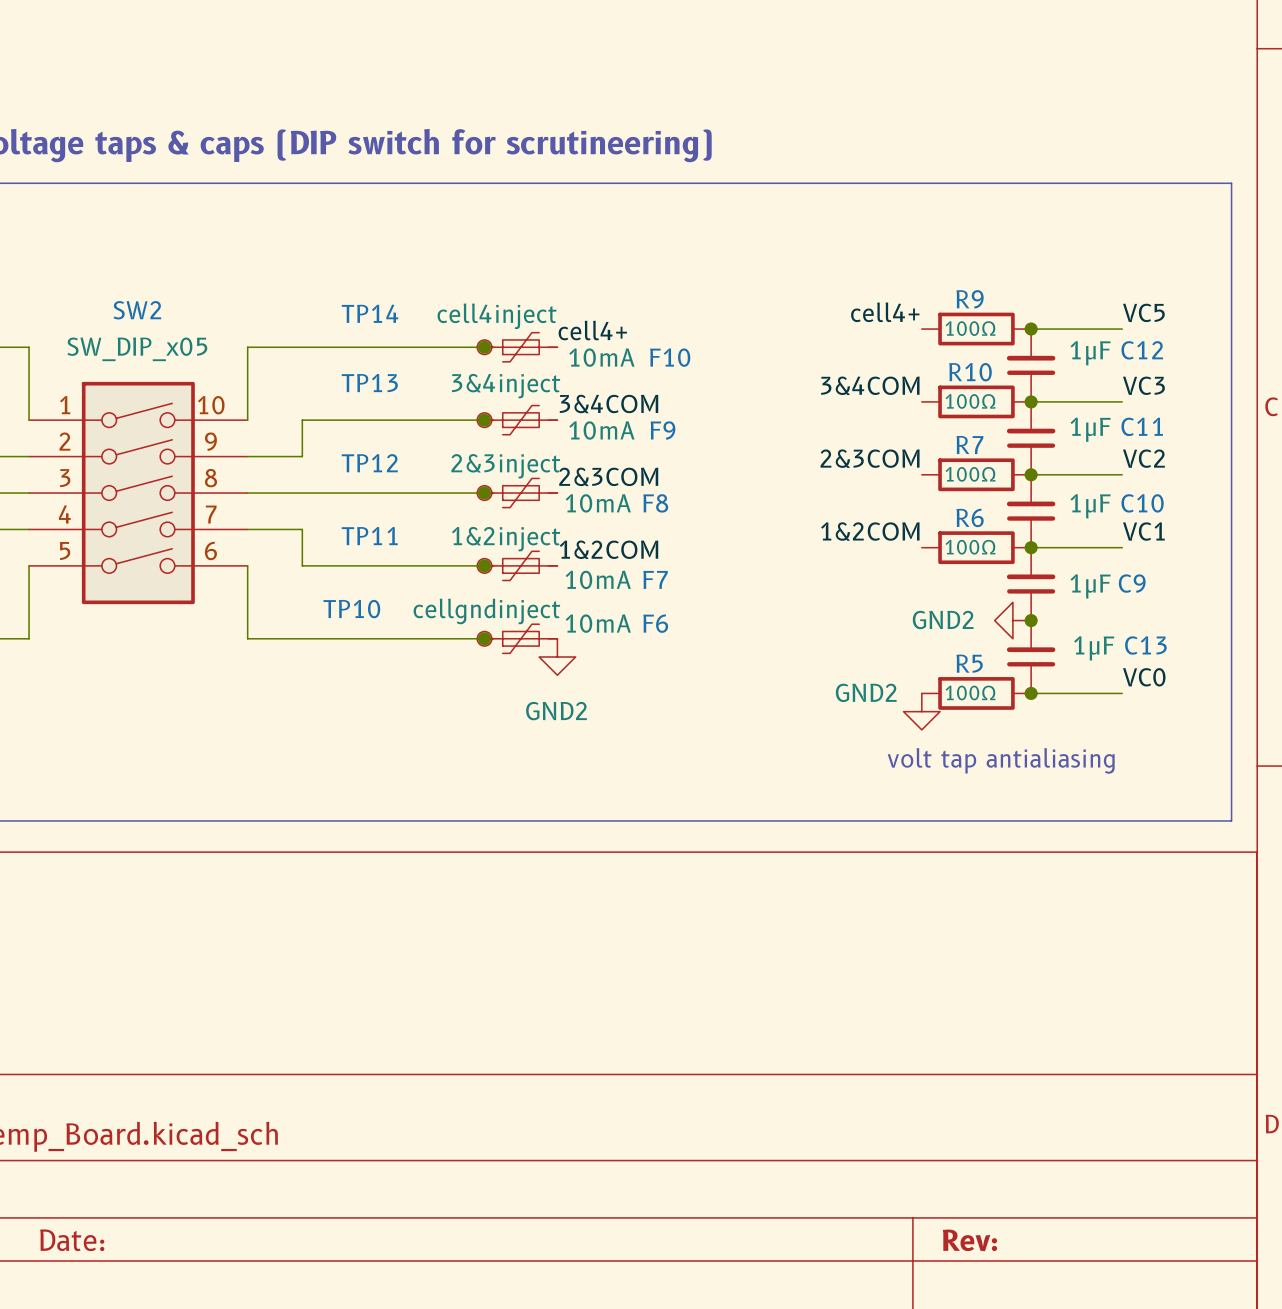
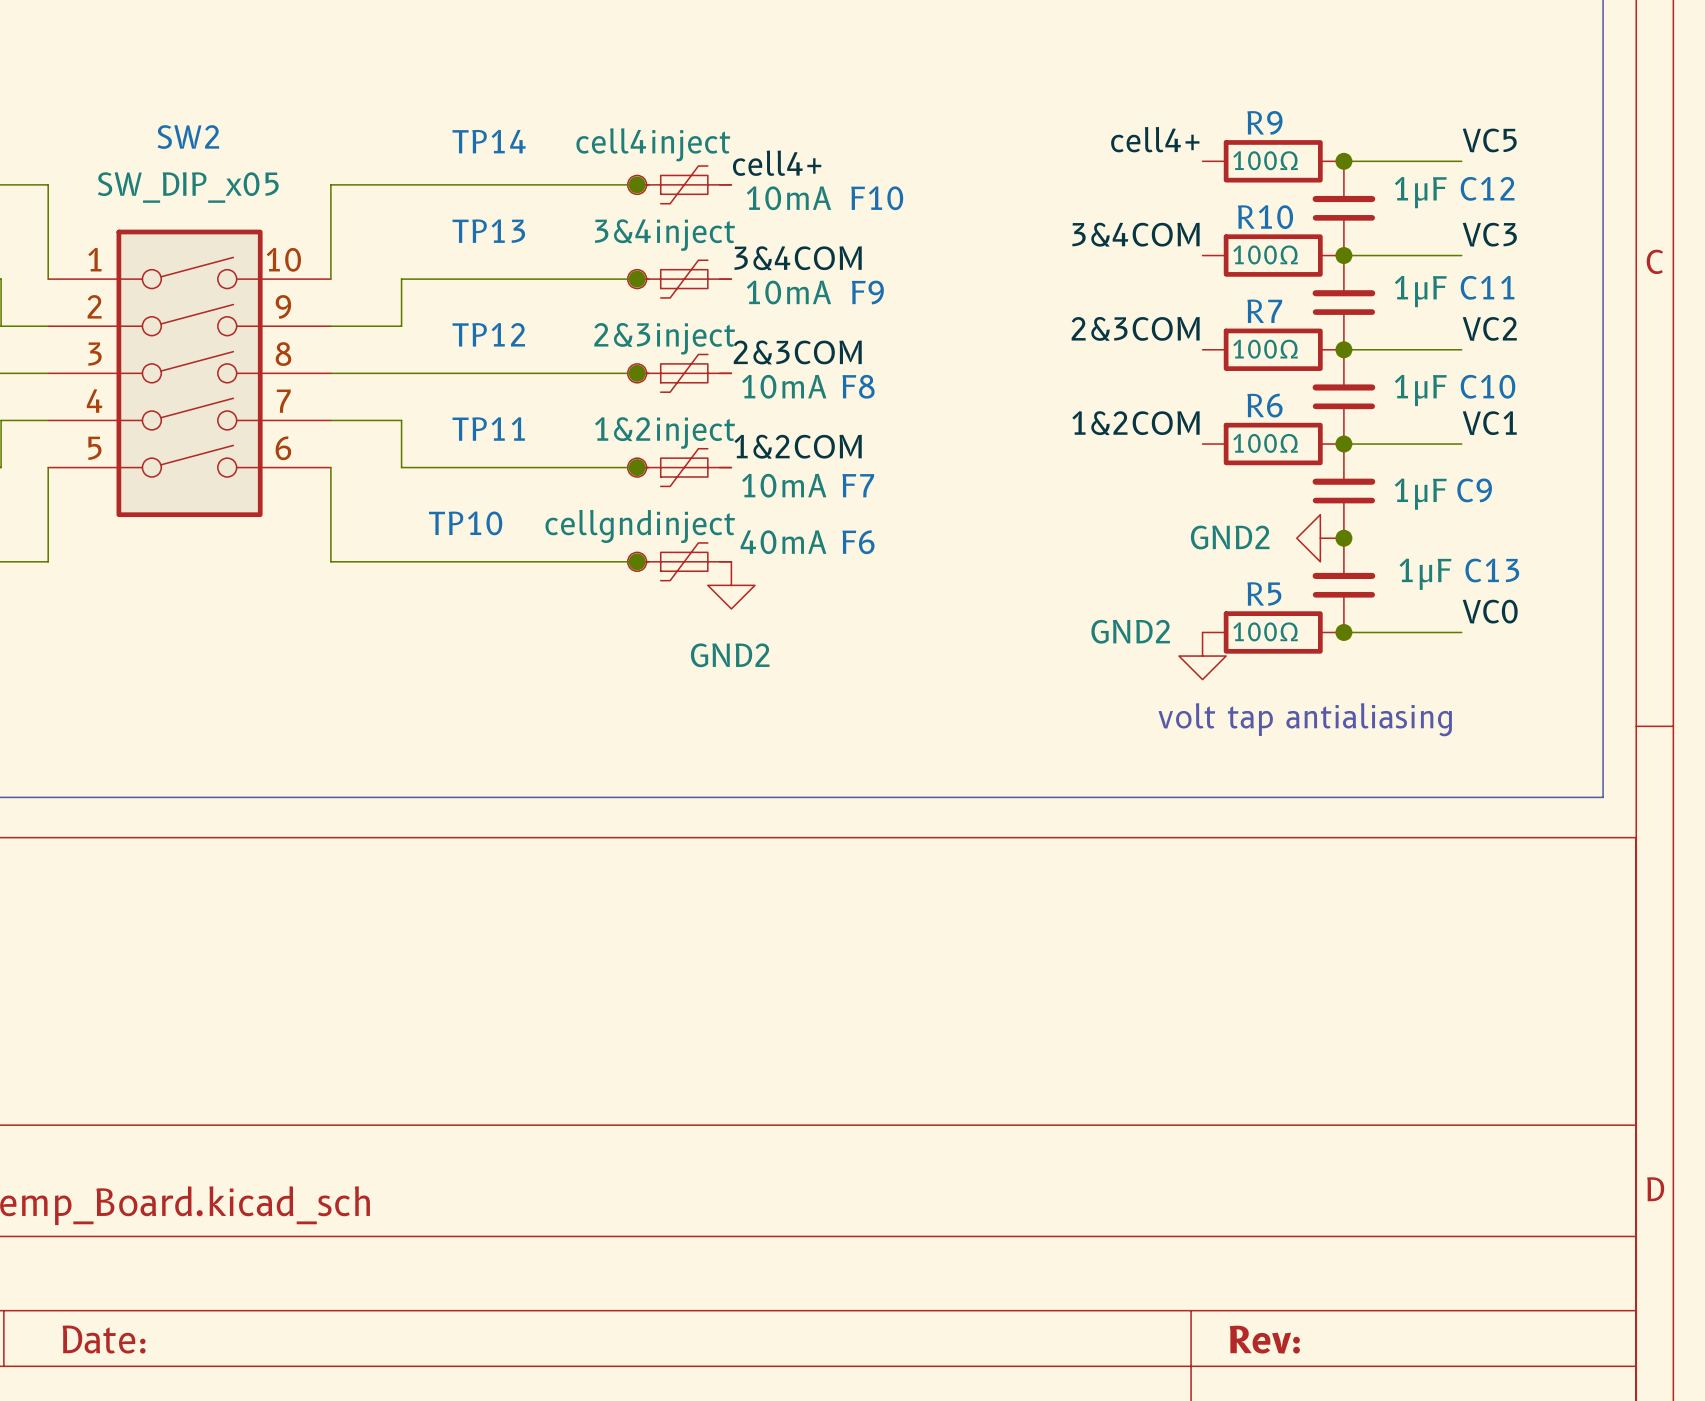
F6 value: 10mA (598, 623) -> 40mA (783, 542)

